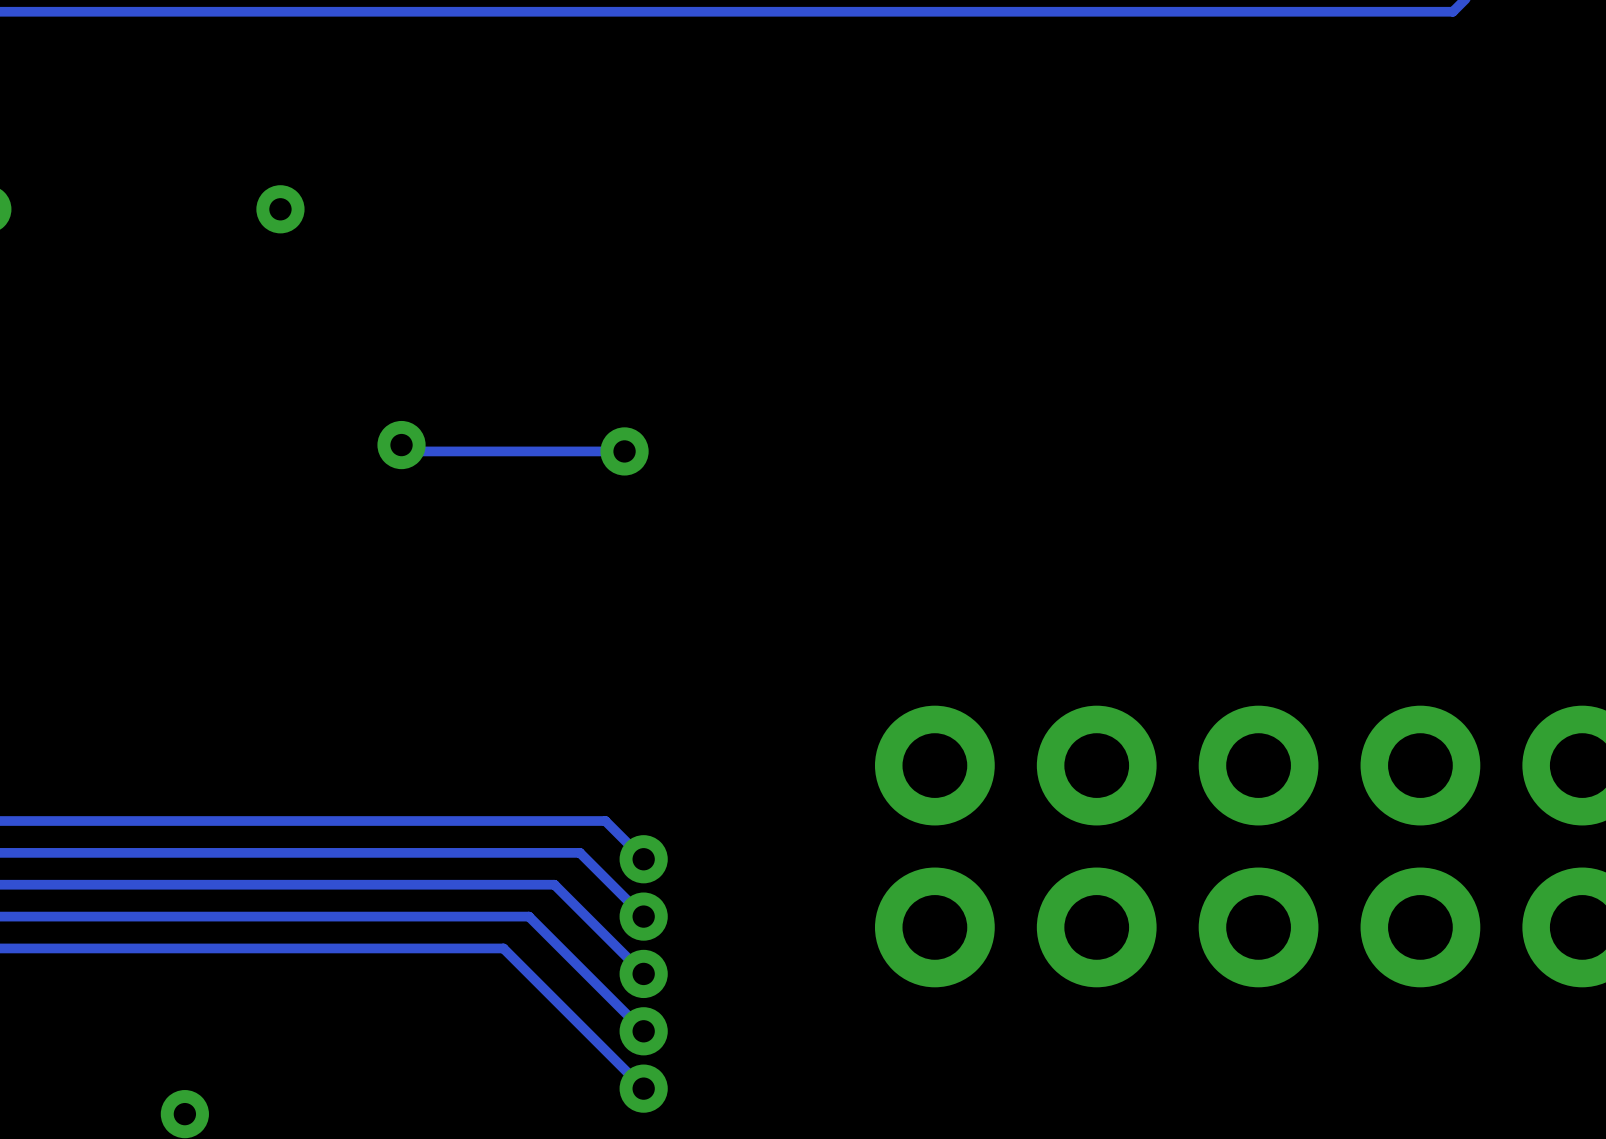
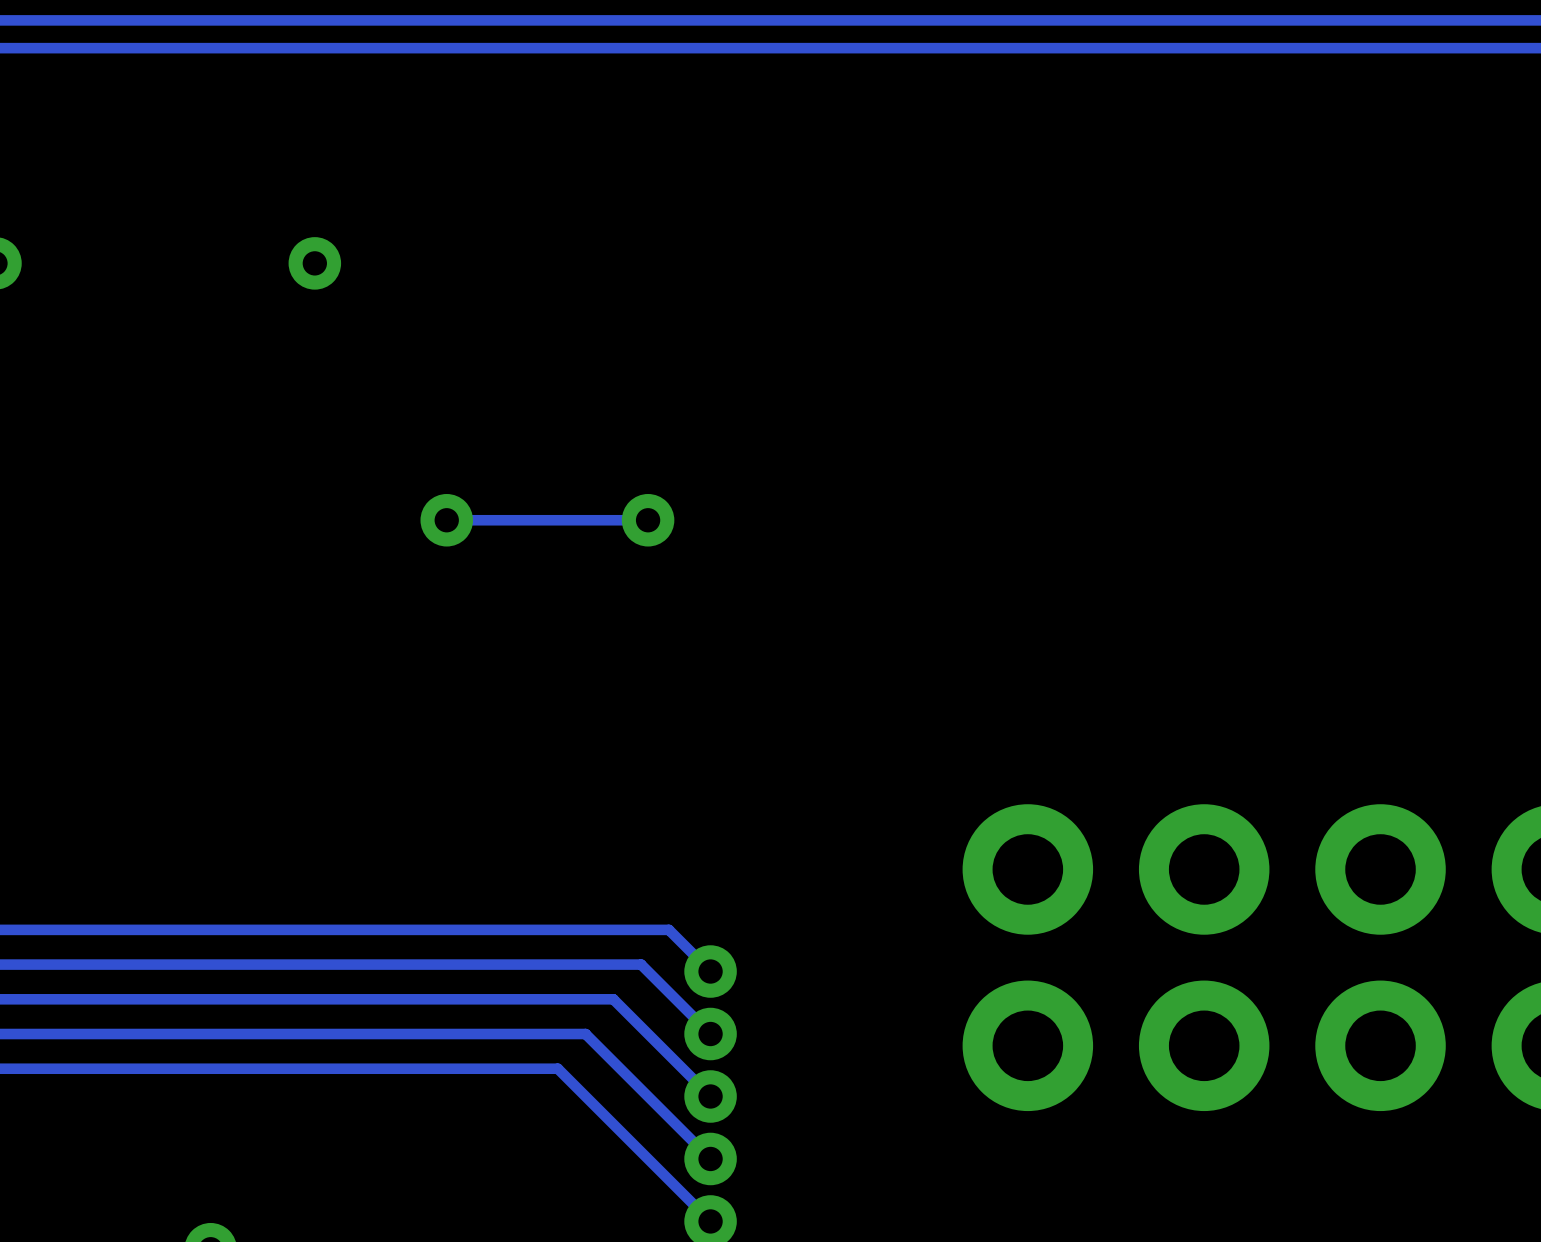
track: (401, 445) (407, 451) (624, 451) -> (446, 520) (648, 520)
via position: (624, 451) -> (648, 520)

